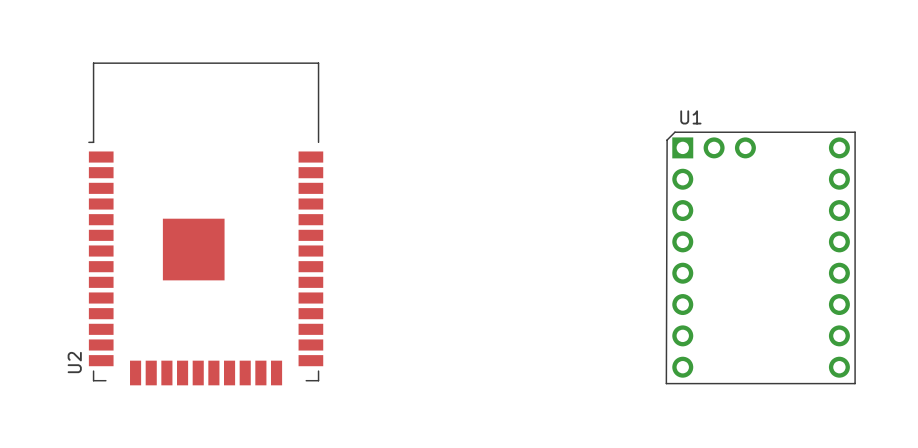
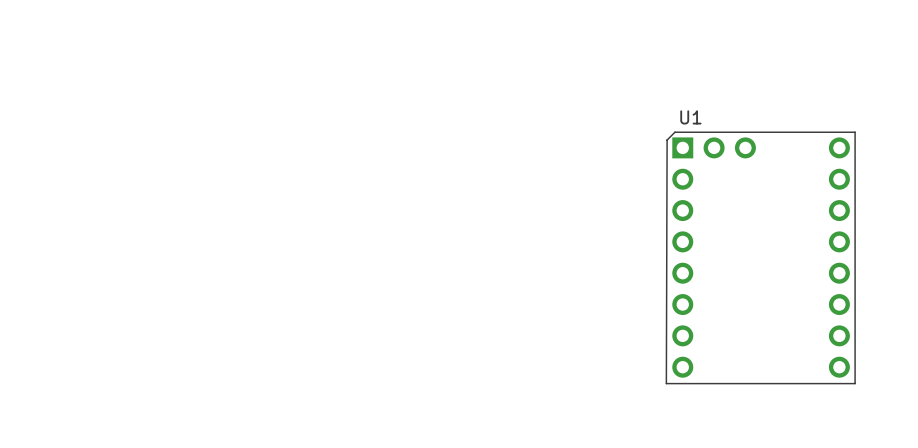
U2: (205, 223) -> none

